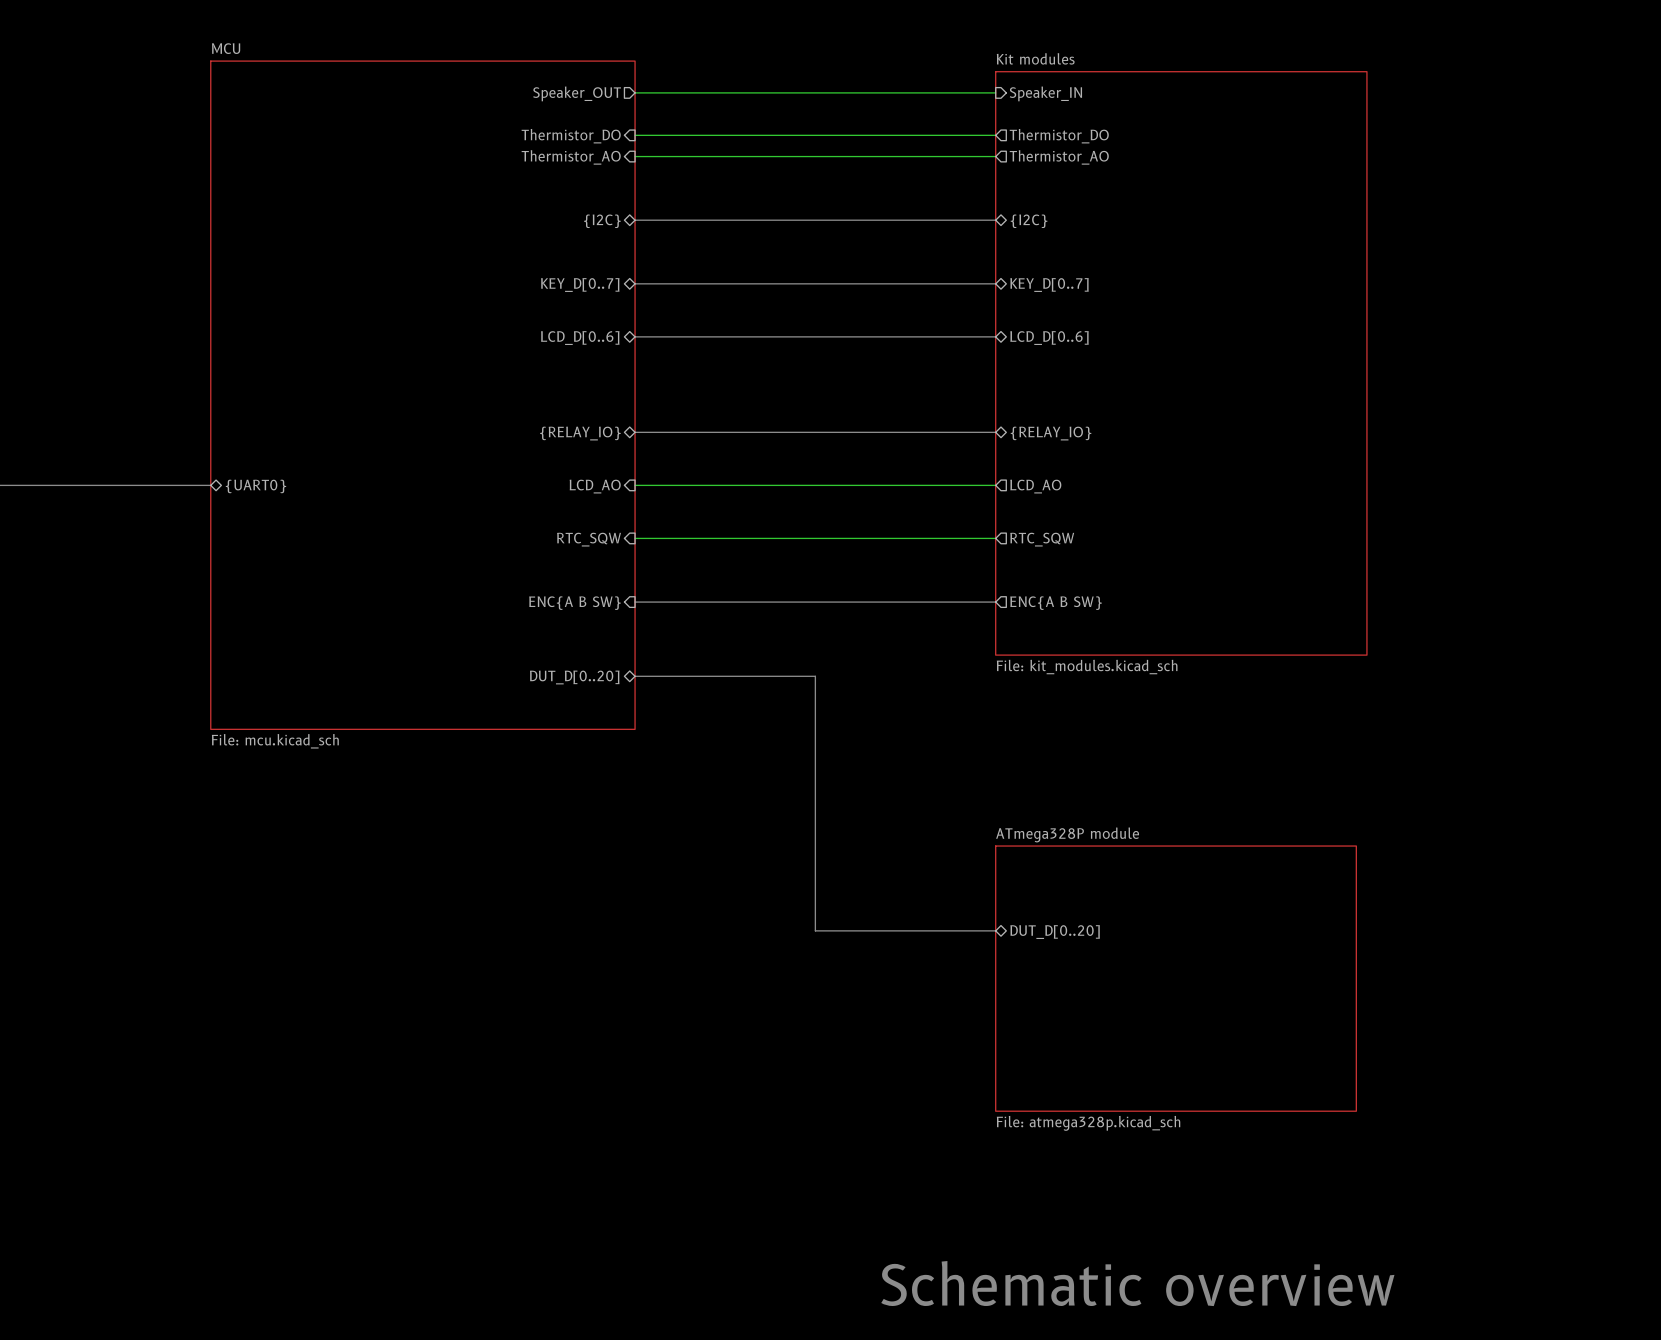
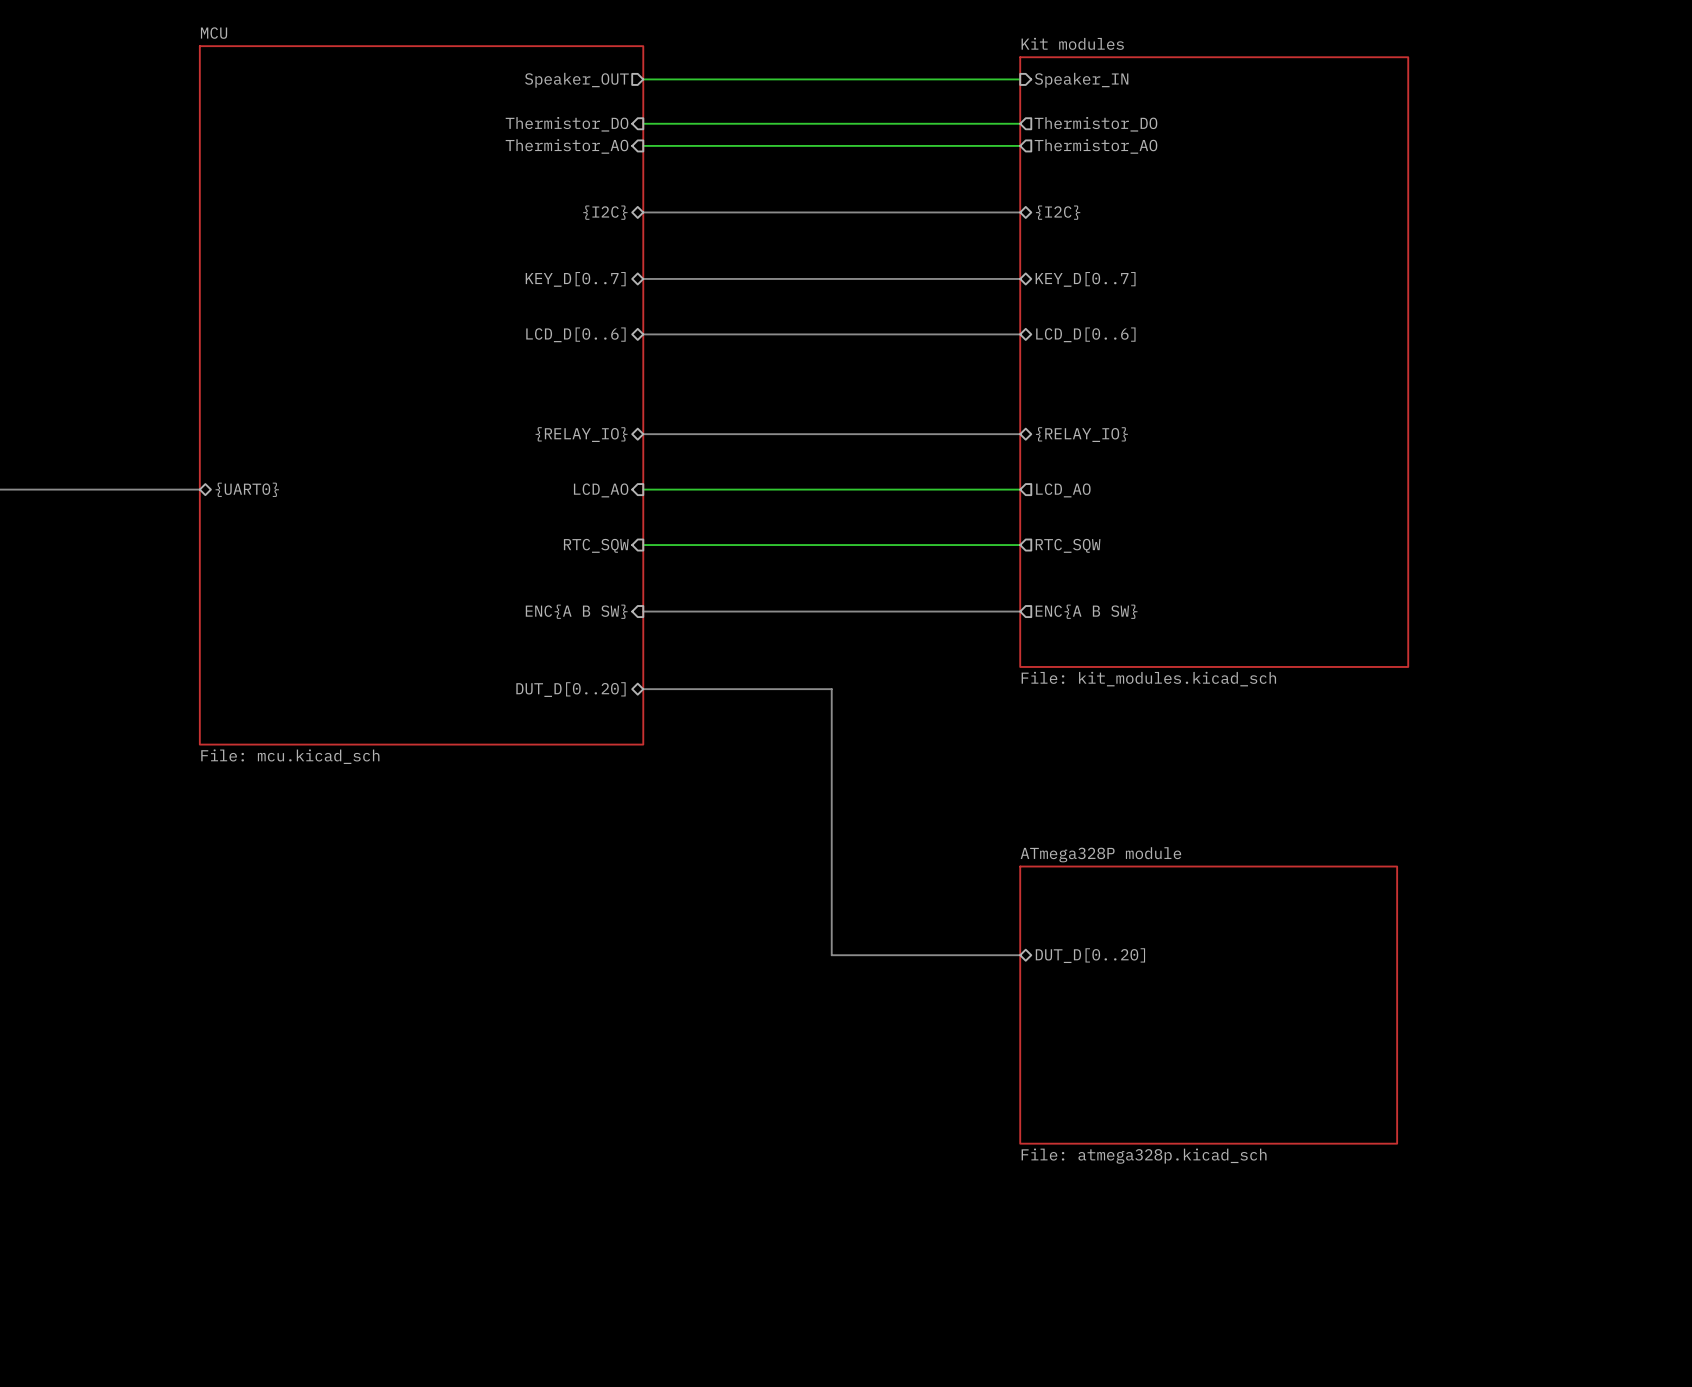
text: Schematic overview (1137, 1283) -> none

